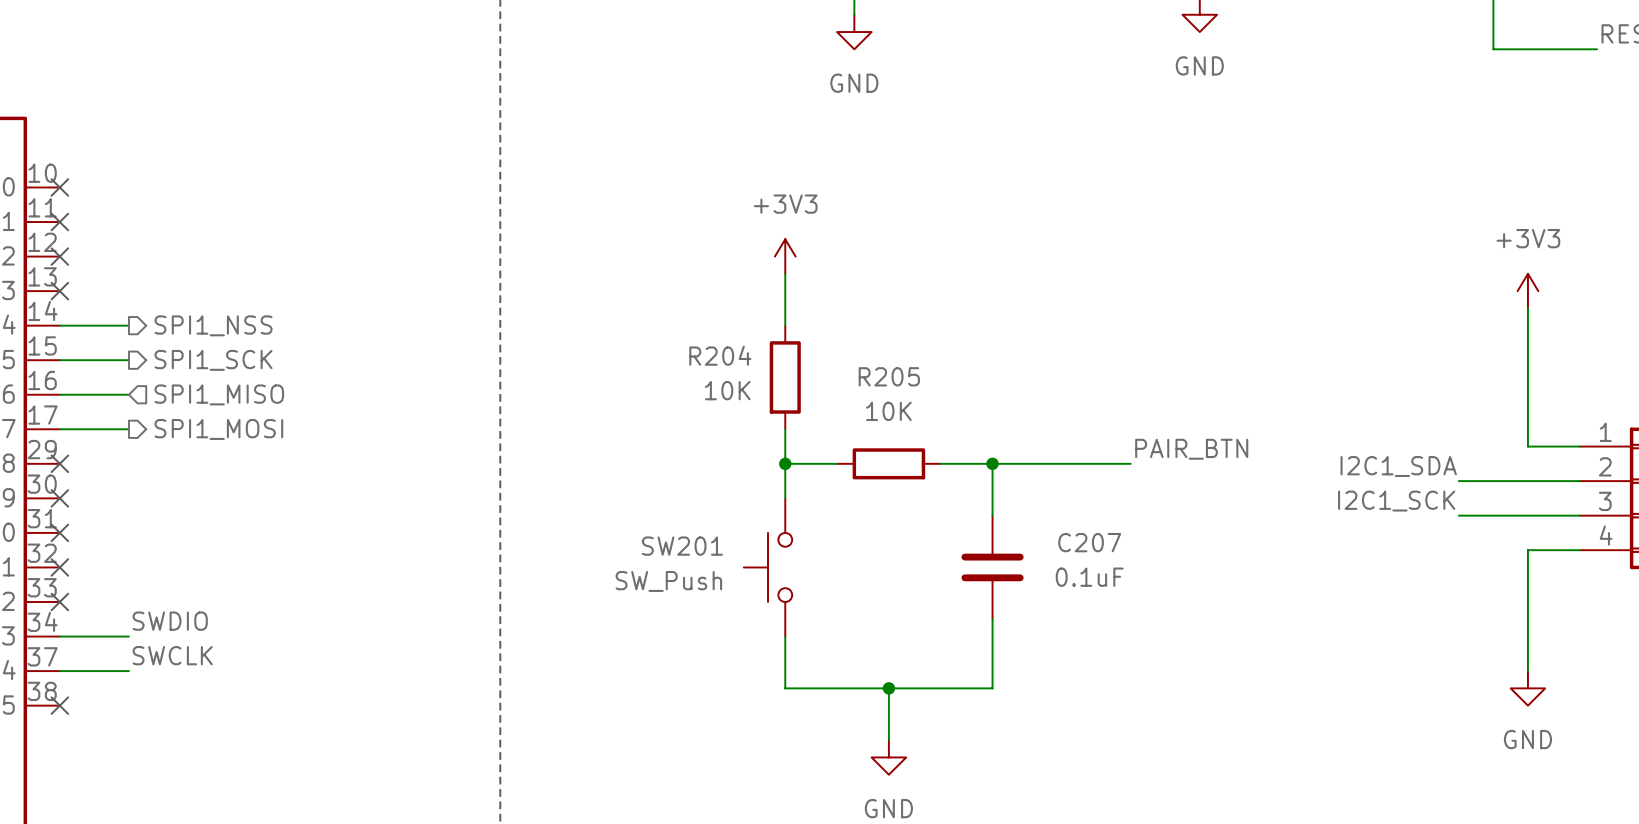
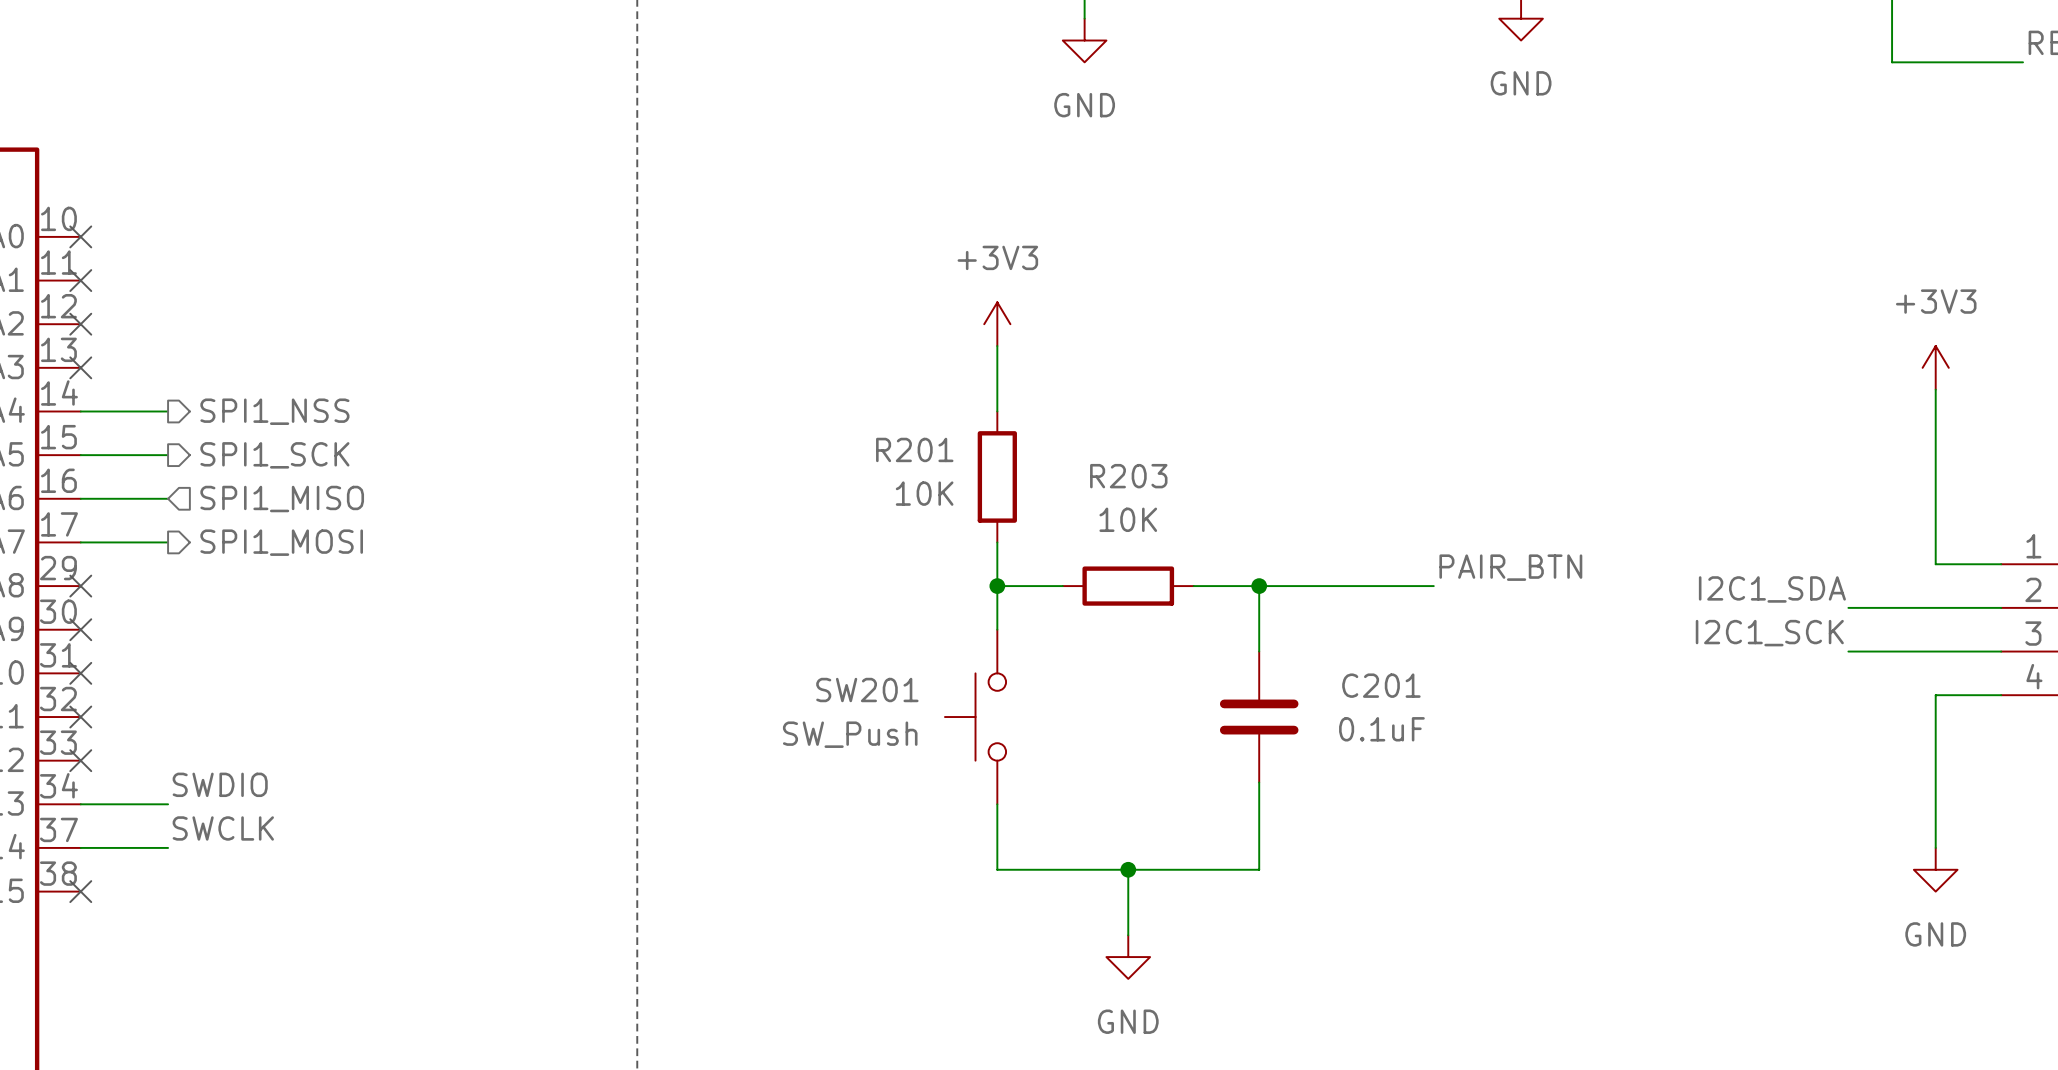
R204 name: R204 (720, 355) -> R201 (914, 449)
R205 name: R205 (889, 376) -> R203 (1128, 476)
C207 name: C207 (1089, 542) -> C201 (1381, 685)

